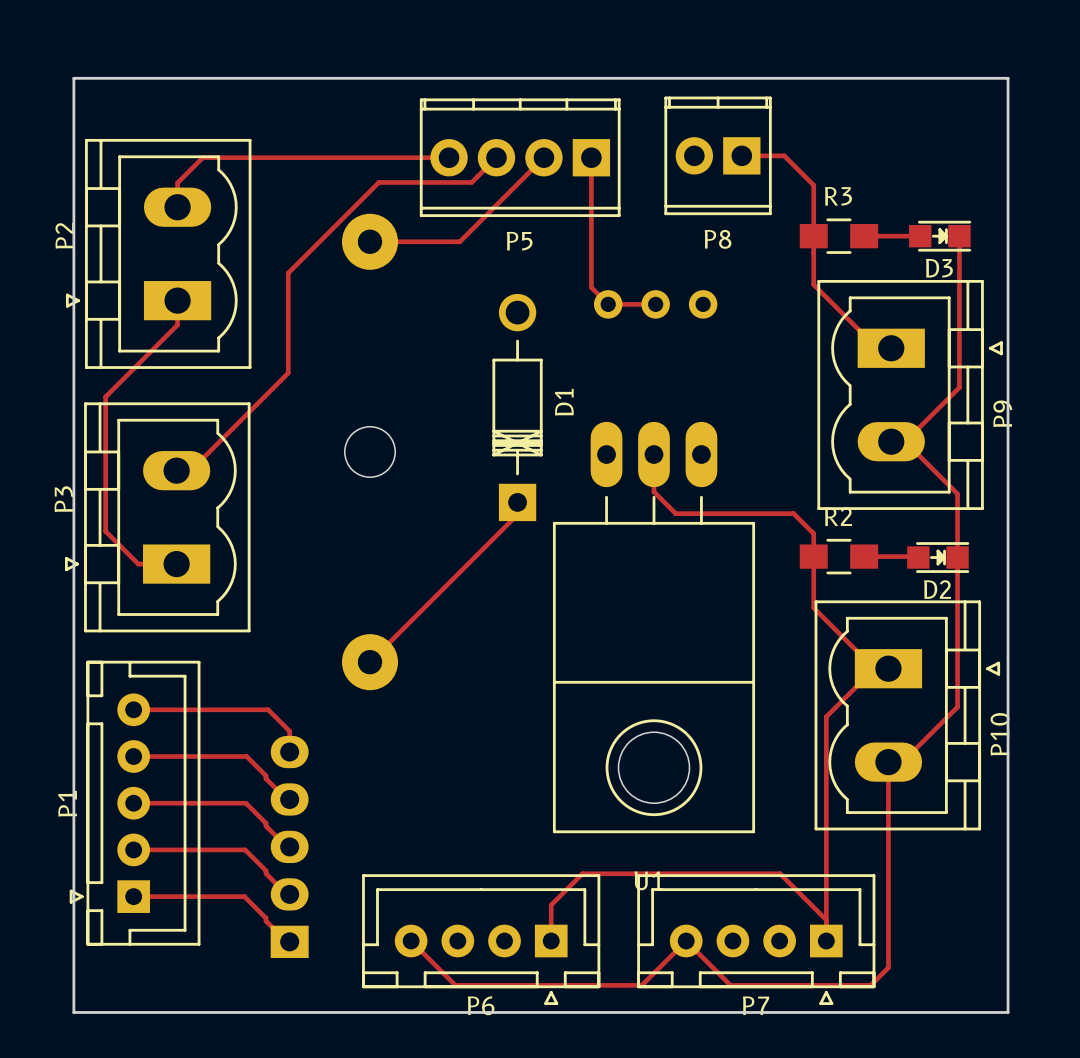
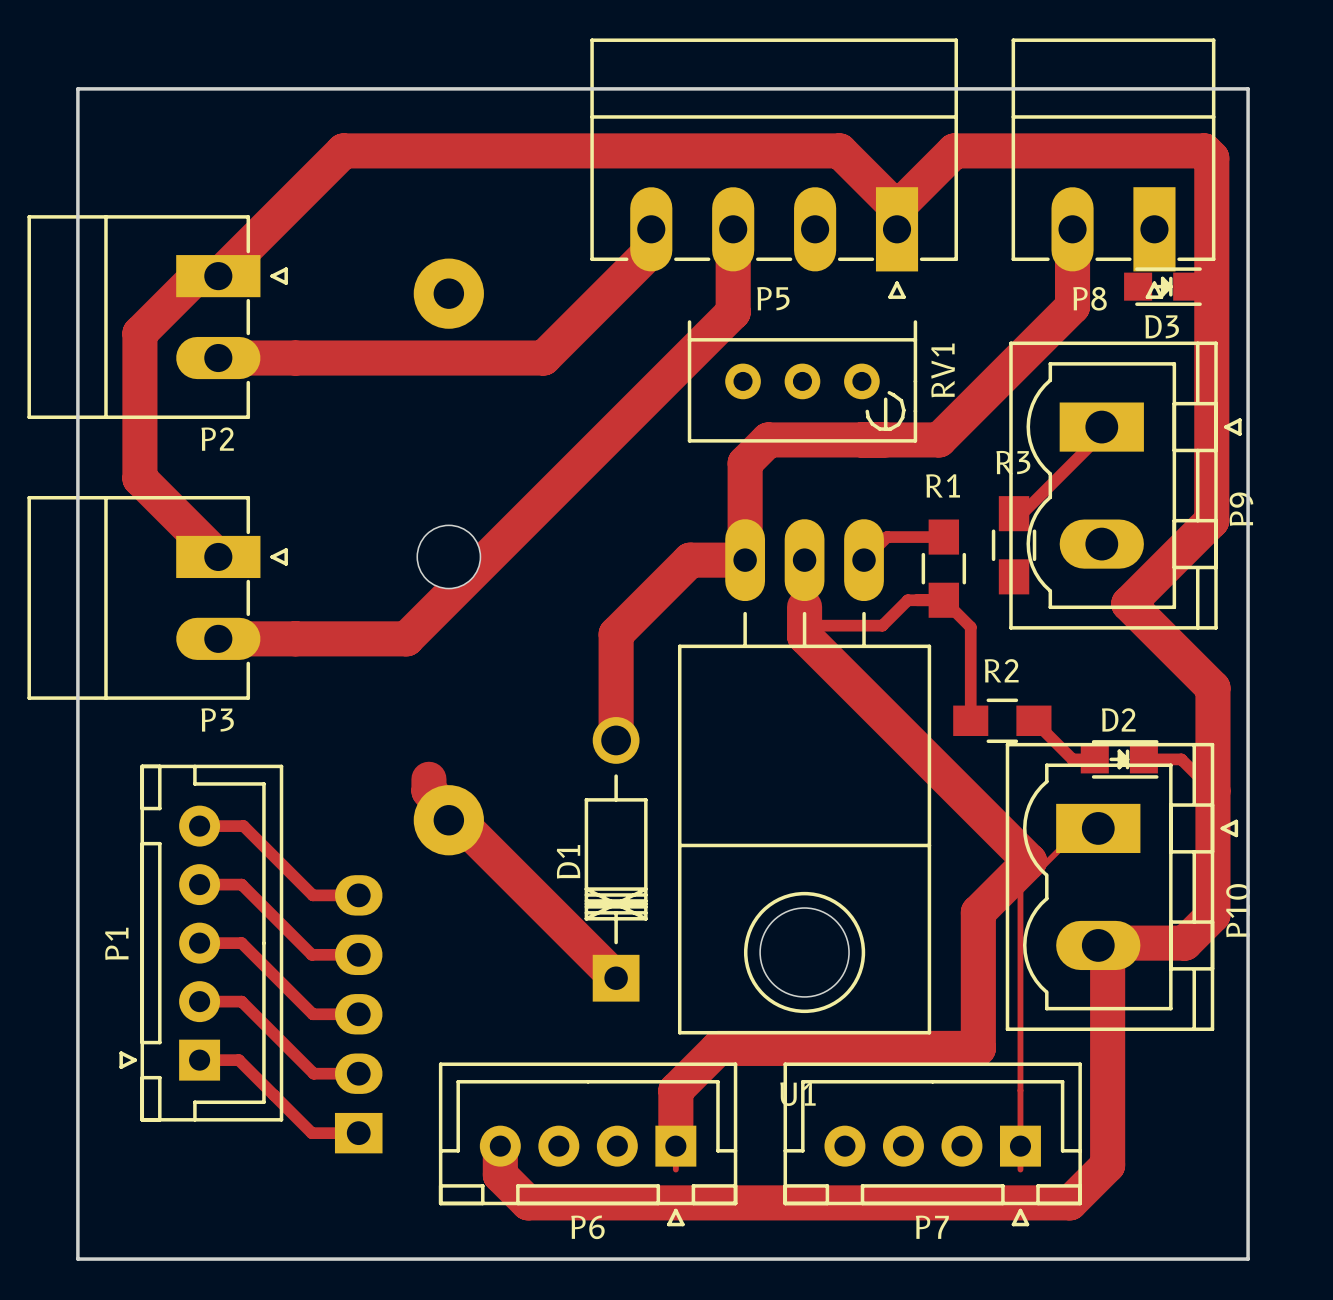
P8 footprint: [664, 96, 772, 216] -> [1011, 38, 1216, 299]
P5 footprint: [419, 98, 621, 218] -> [590, 38, 958, 299]
P2 footprint: [65, 138, 252, 369] -> [27, 215, 288, 419]
track: (741, 155) (784, 155) (813, 185) (813, 284) (877, 348) (891, 348) -> none
track: (449, 157) (202, 157) (177, 182) (177, 207) -> none
track: (496, 157) (471, 182) (378, 182) (288, 273) (288, 373) (190, 470) (176, 470) -> none
track: (543, 157) (459, 241) (370, 241) -> none
track: (591, 157) (591, 287) (608, 304) (655, 304) -> none
track: none -> (897, 208) (954, 150) (1204, 150) (1211, 158) (1211, 520) (1128, 603) (1212, 688) (1212, 915) (1184, 943) (1107, 943) (1107, 1165) (1069, 1202) (528, 1202) (500, 1175) (500, 1146)
track: none -> (897, 208) (839, 150) (343, 150) (218, 276) (197, 276) (139, 333) (139, 478) (218, 556)
track: none -> (651, 229) (651, 250) (543, 358) (218, 358)
track: none -> (733, 229) (733, 312) (406, 638) (218, 638)
track: none -> (1072, 229) (1072, 306) (939, 439) (768, 439) (745, 463) (745, 560) (690, 560) (616, 634) (616, 740)
P2 name position: P2 (64, 235) -> P2 (217, 439)
R3 rotation: 0° (838, 236) -> 90° clockwise (1014, 545)
R3 position: (838, 236) -> (1014, 545)
track: (864, 236) (920, 236) -> none
track: (959, 236) (959, 387) (905, 441) -> none
track: (177, 300) (177, 324) (105, 396) (105, 531) (138, 564) (176, 564) -> none
RV1 side: bottom (655, 304) -> top (802, 381)
track: none -> (1093, 416) (1093, 442) (1022, 513) (1014, 513)
P3 footprint: [65, 402, 251, 633] -> [27, 495, 288, 700]
D1 name position: D1 (564, 402) -> D1 (568, 861)
D1 position: (517, 407) -> (616, 859)
track: none -> (943, 537) (887, 537) (864, 560)
track: (905, 441) (957, 493) (957, 707) (902, 762) (888, 762) (888, 967) (870, 985) (730, 985) (686, 941) (641, 985) (455, 985) (411, 941) -> none
R1: none -> (943, 568)
track: (653, 491) (675, 513) (793, 513) (813, 533) (813, 607) (874, 668) (888, 668) -> none
P3 name position: P3 (63, 499) -> P3 (217, 719)
track: (517, 502) (517, 514) (370, 662) -> none
track: none -> (804, 636) (804, 606) (804, 612) (817, 625) (882, 625) (907, 600) (943, 600) (970, 627) (970, 720) (968, 720)
R2 position: (838, 556) -> (1002, 720)
track: (864, 556) (918, 557) -> none
D2 position: (938, 557) -> (1119, 759)
track: none -> (1033, 720) (1072, 759) (1094, 759)
D2 name position: D2 (937, 589) -> D2 (1118, 719)
track: none -> (1143, 759) (1181, 759) (1212, 790)
track: none -> (428, 779) (428, 791) (616, 978)
track: none -> (199, 826) (243, 826) (312, 895) (358, 895)
track: (133, 709) (268, 709) (289, 731) (289, 752) -> none
track: none -> (199, 884) (241, 884) (311, 954) (358, 954)
track: (133, 756) (246, 756) (266, 775) (266, 778) (286, 799) (289, 799) -> none
track: none -> (199, 943) (241, 943) (312, 1014) (358, 1014)
track: (133, 803) (245, 803) (286, 846) (289, 846) -> none
P1 position: (135, 803) -> (201, 943)
track: none -> (199, 1001) (241, 1001) (313, 1073) (358, 1073)
part position: (289, 846) -> (358, 1014)
track: (133, 849) (245, 849) (286, 894) (289, 894) -> none
track: none -> (199, 1060) (238, 1060) (311, 1133) (358, 1133)
track: (133, 896) (244, 896) (286, 941) (289, 941) -> none
track: (551, 905) (582, 873) (780, 873) (826, 919) -> (675, 1124) (675, 1090) (717, 1048) (978, 1048) (978, 912) (1029, 861) (804, 636)
P6 position: (481, 939) -> (588, 1144)
P7 position: (756, 939) -> (932, 1144)

